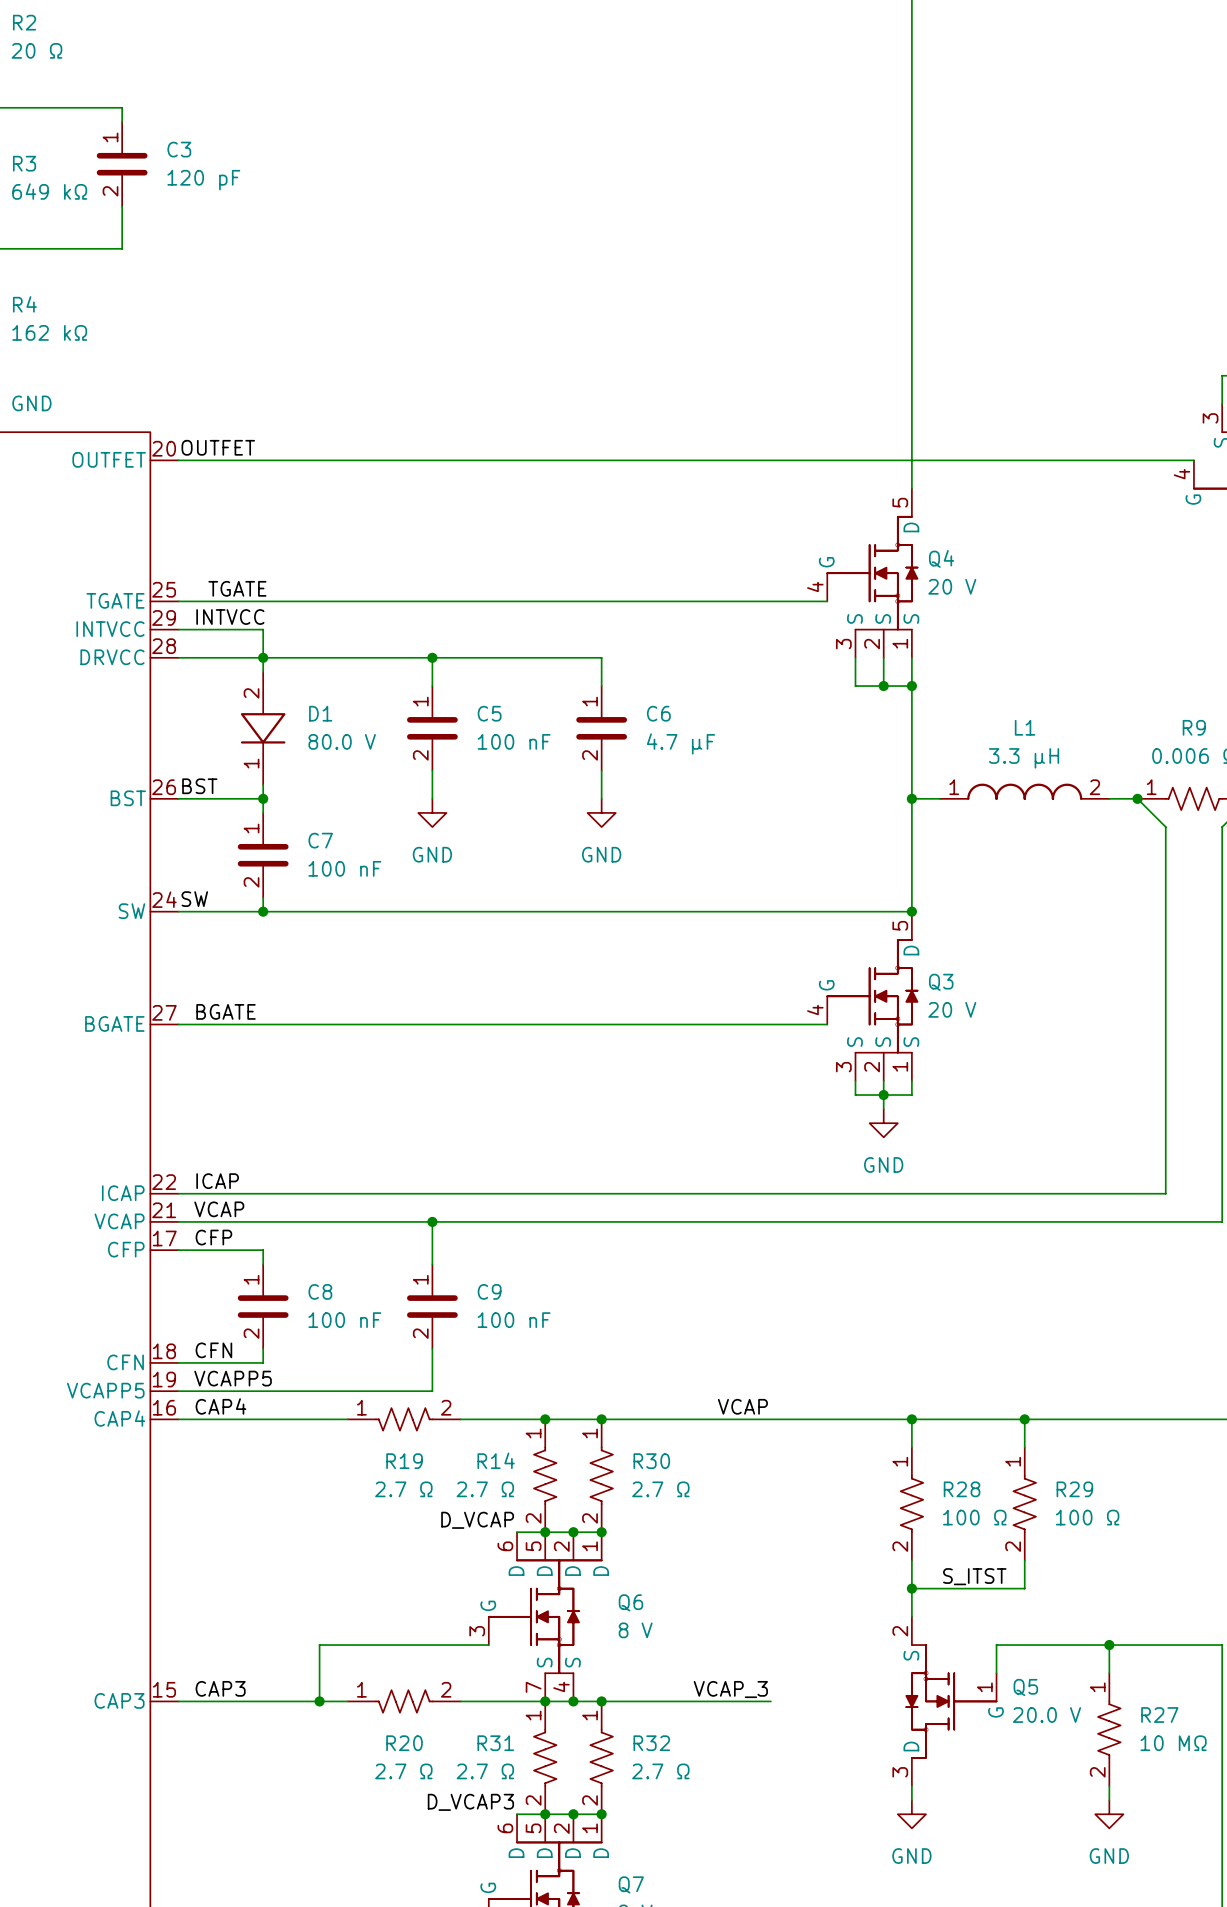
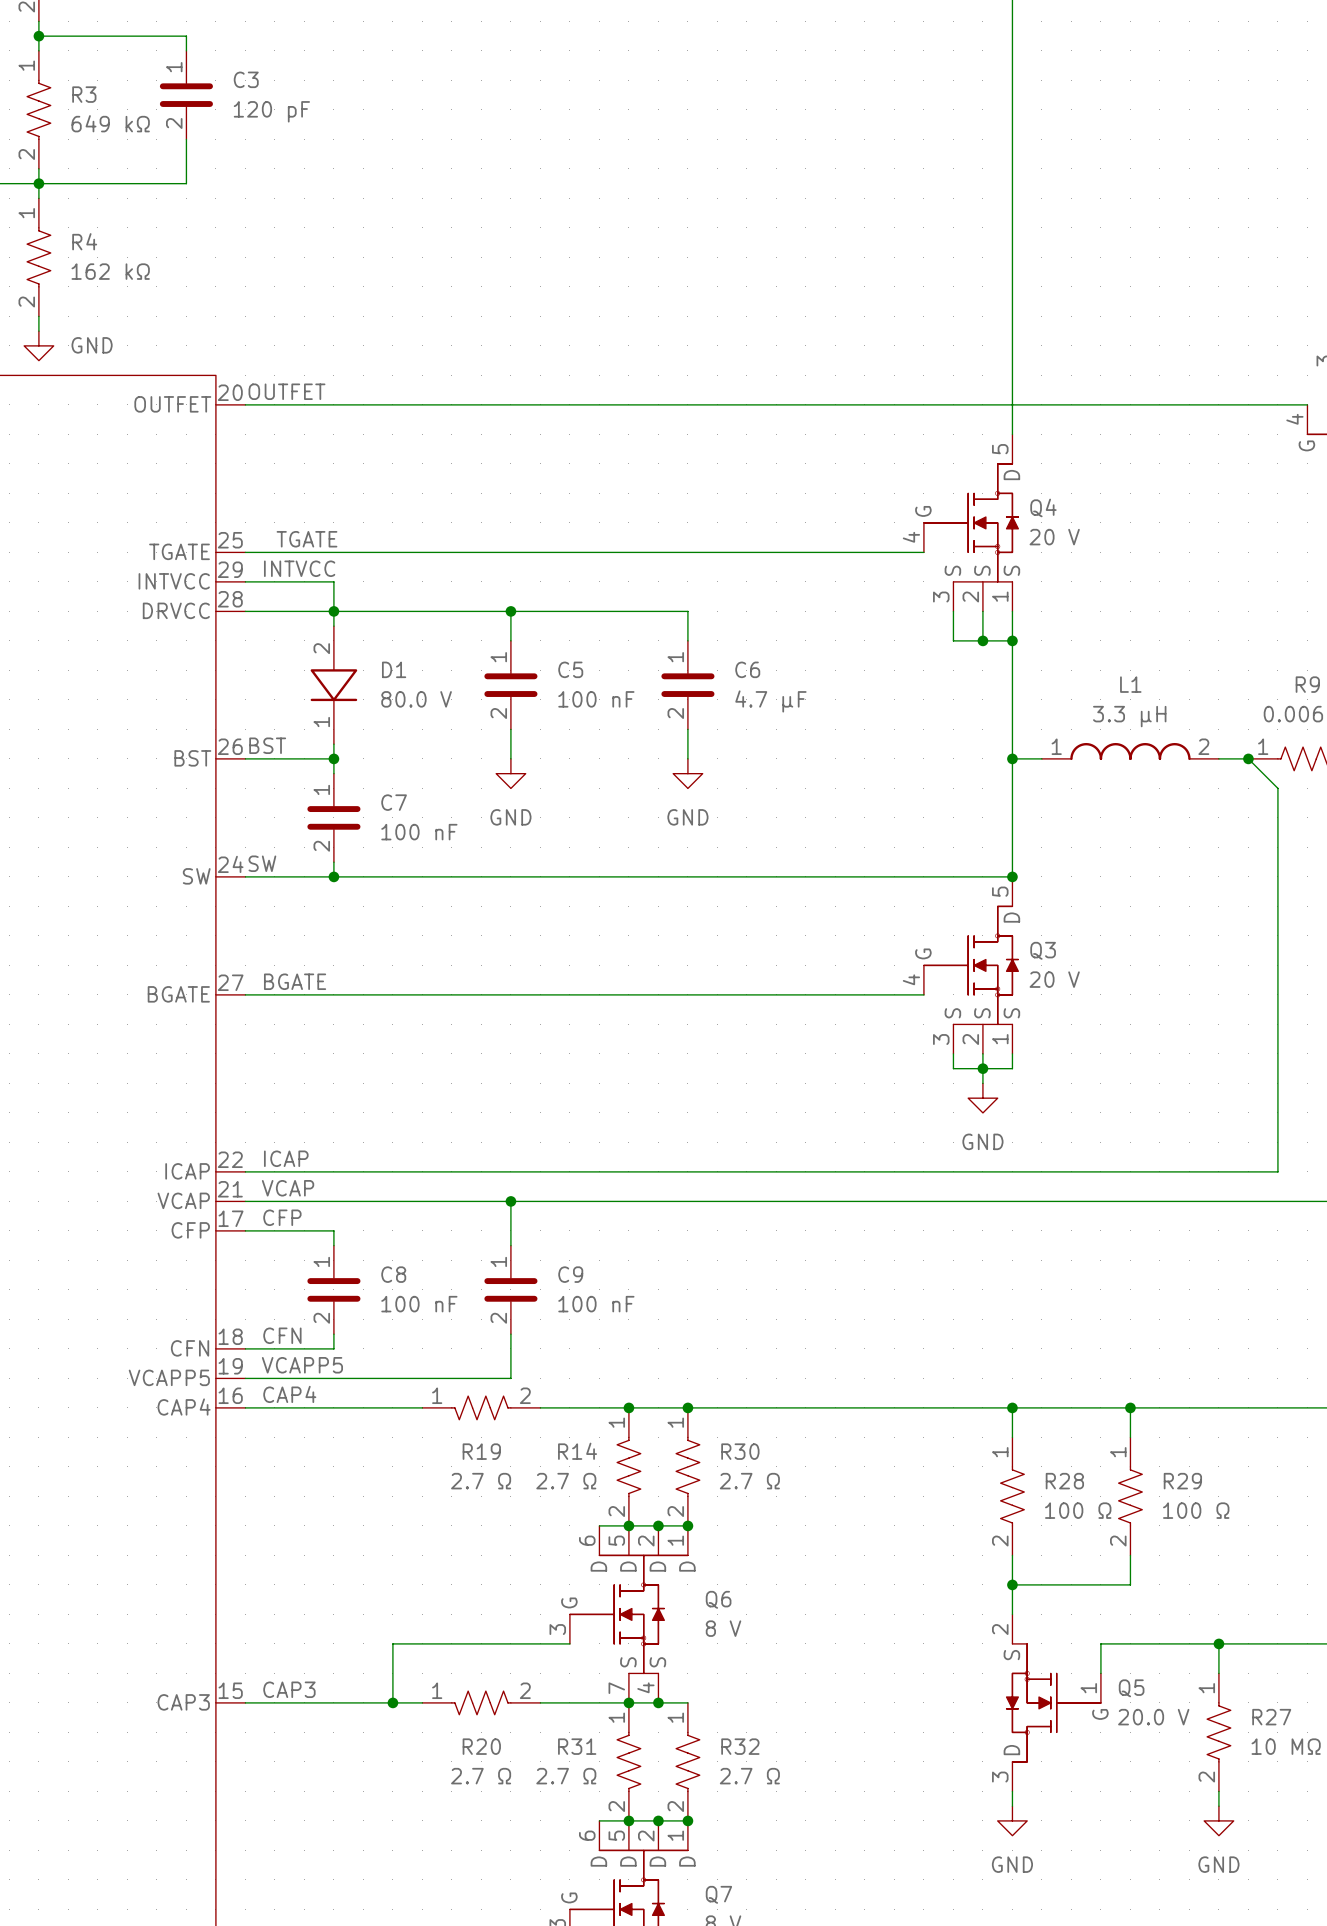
label: VCAP (742, 1406) -> none
label: D_VCAP (477, 1520) -> none
label: S_ITST (974, 1576) -> none
label: VCAP_3 (730, 1689) -> none
wire: (601, 1701) (770, 1701) -> none
junction: (601, 1701) -> none
label: D_VCAP3 (470, 1802) -> none

